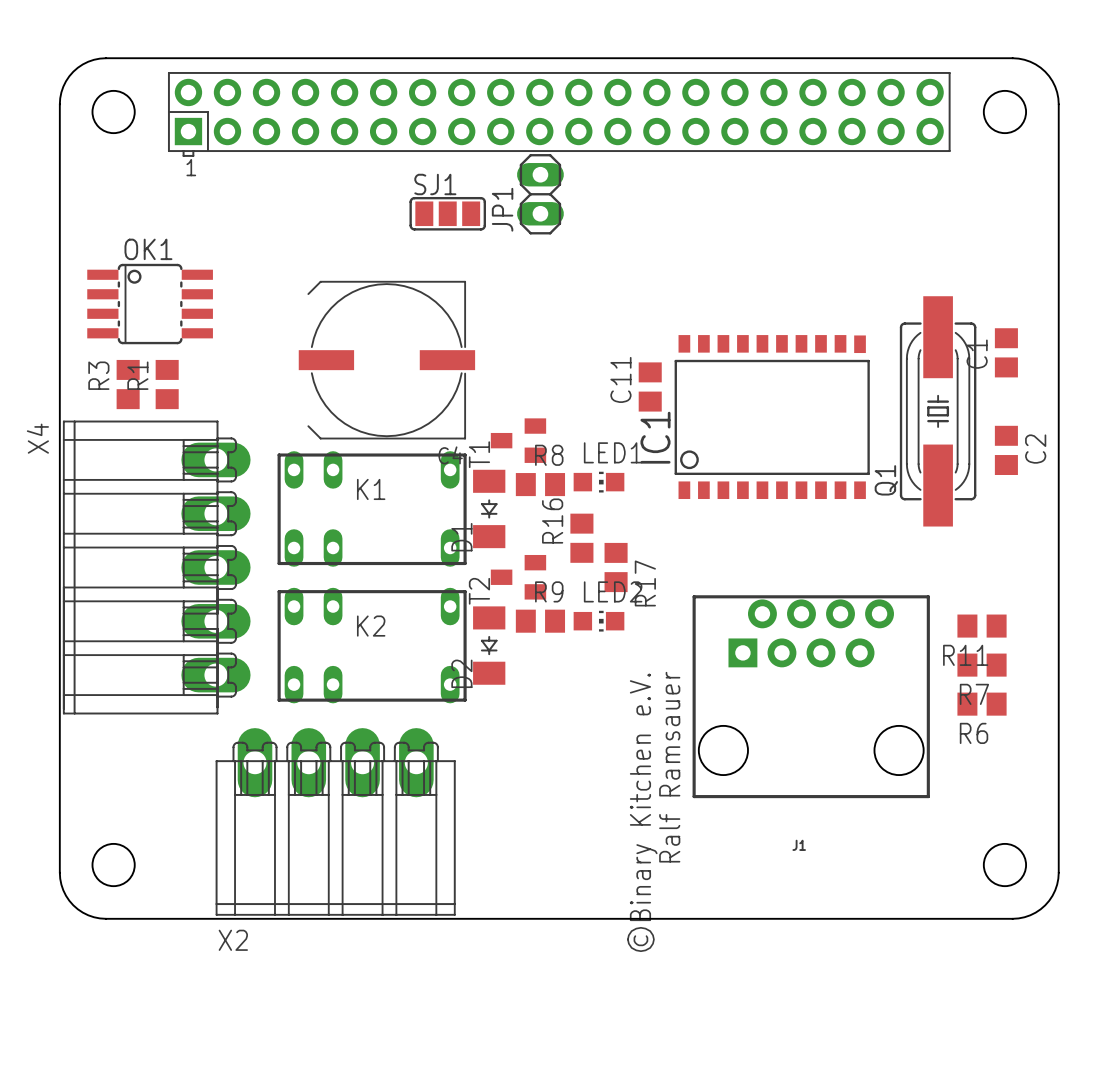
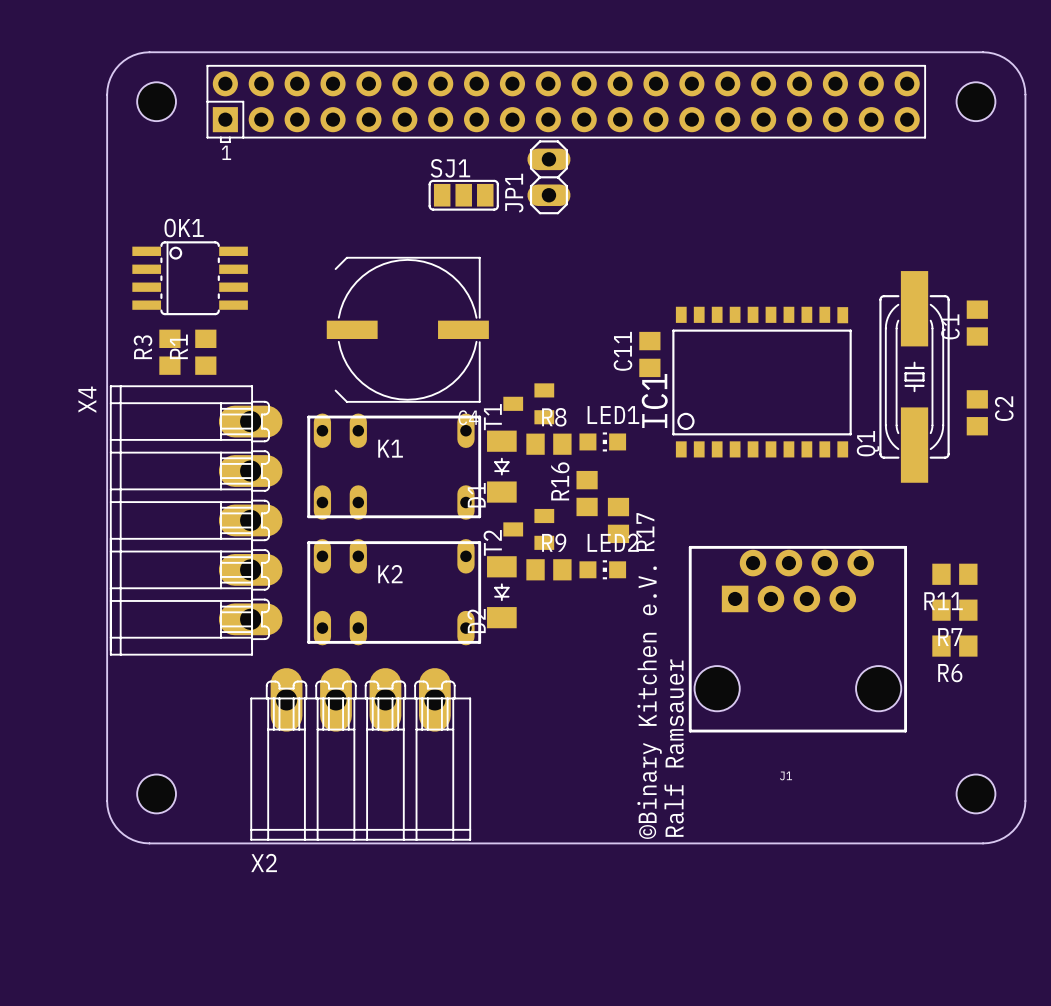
text position: Ralf Ramsauer (669, 767) -> Ralf Ramsauer (674, 748)
text position: ©Binary Kitchen e.V. (642, 812) -> ©Binary Kitchen e.V. (649, 702)

